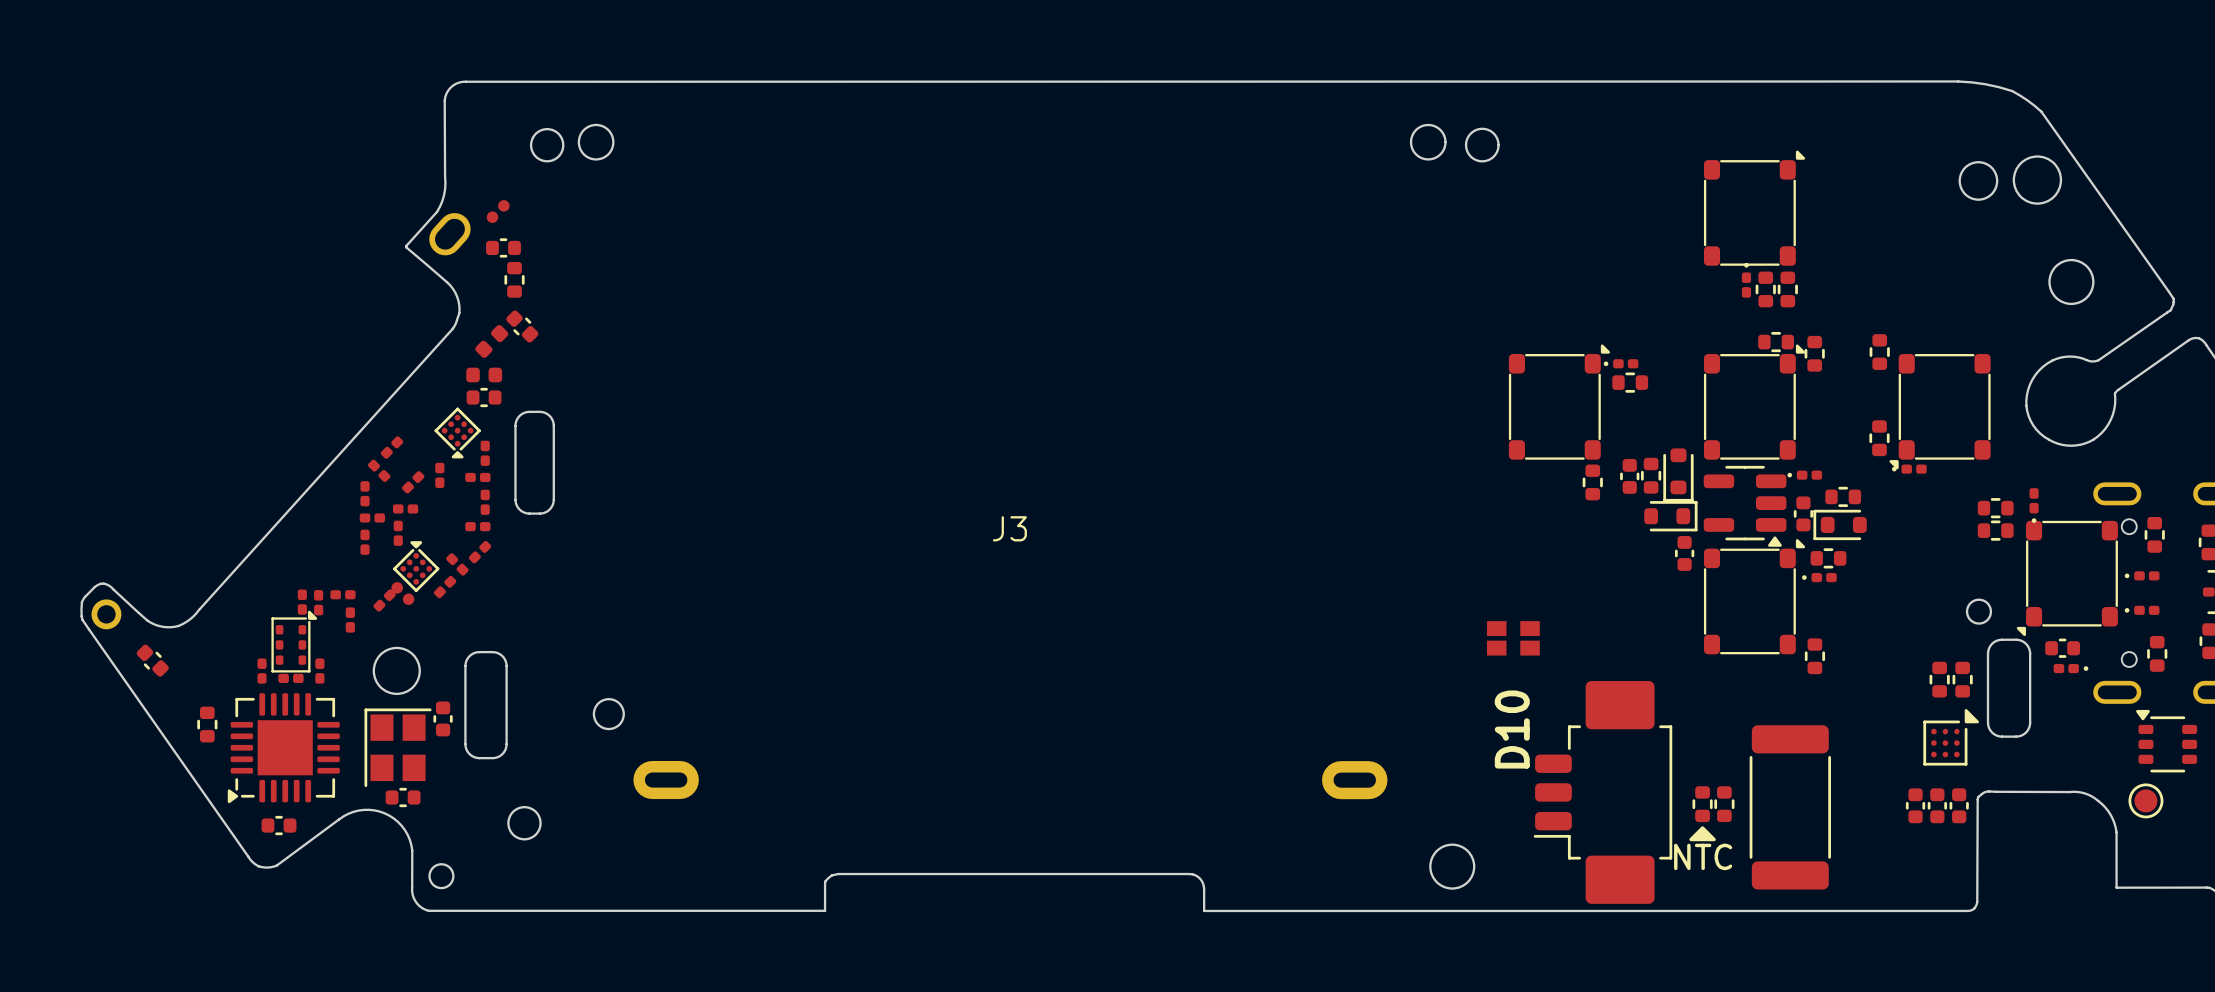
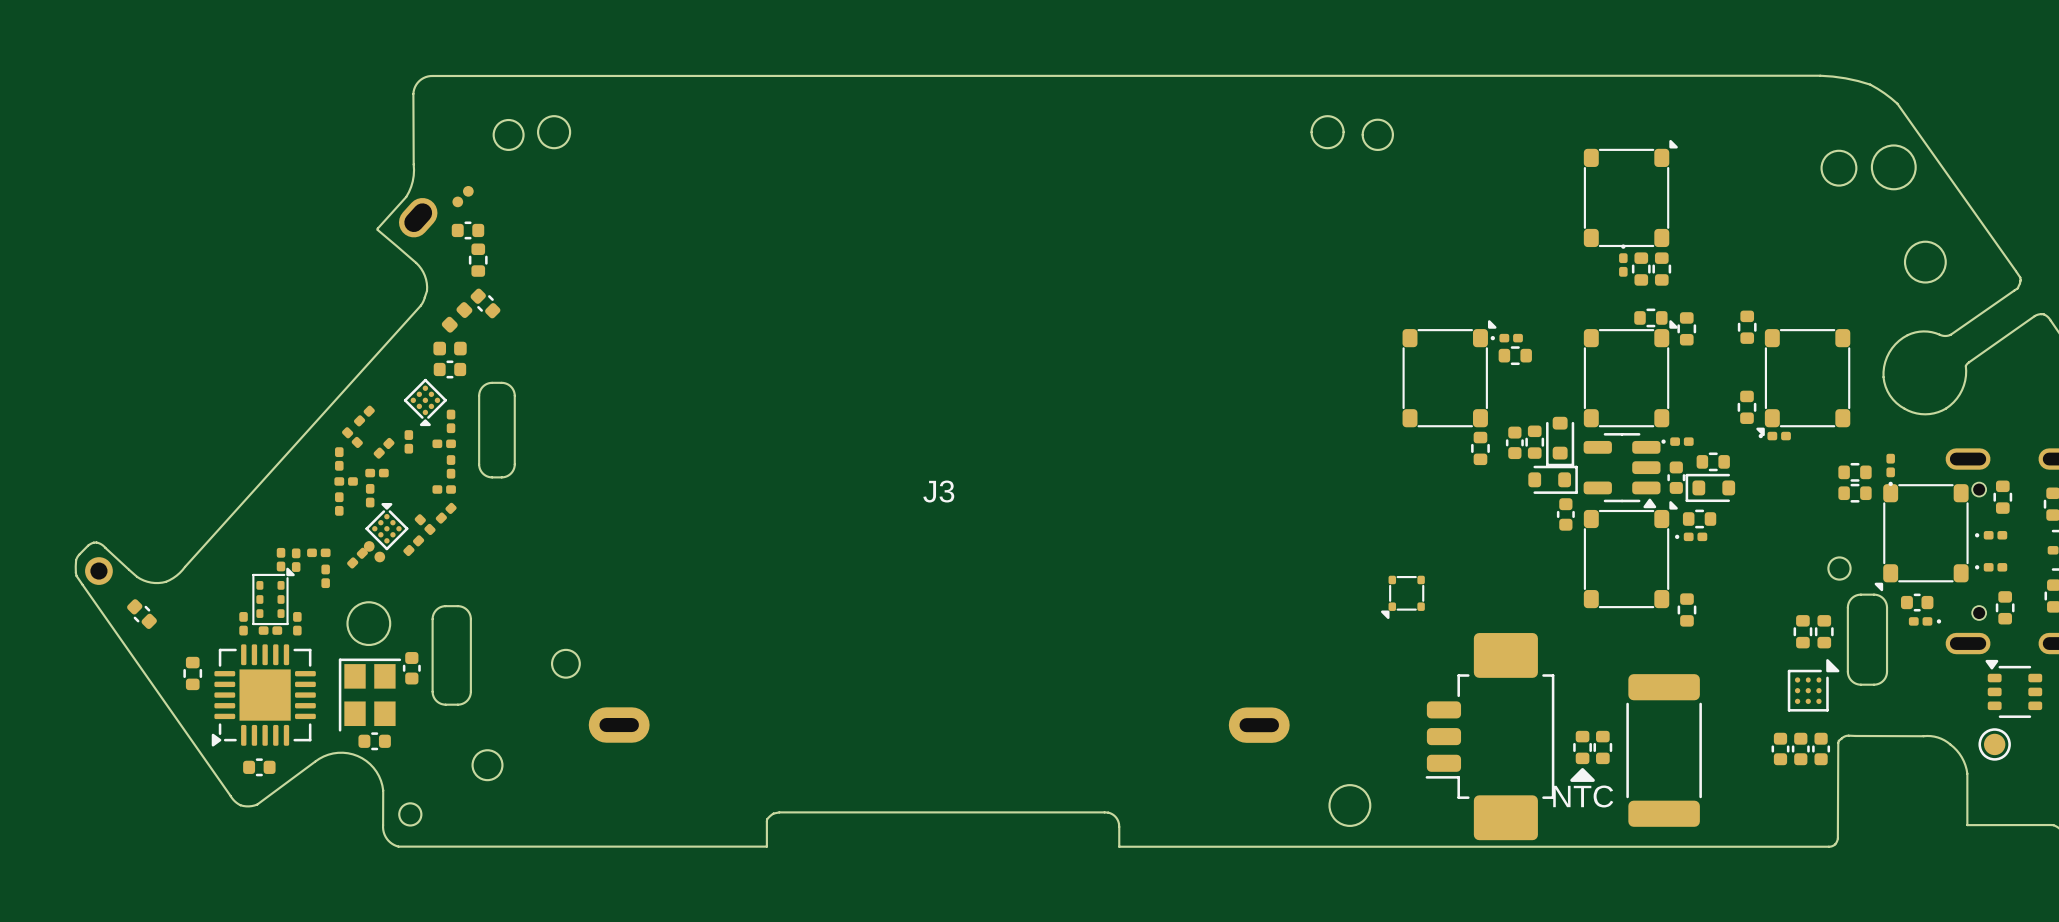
D10: (1513, 638) -> none
part: none -> (1402, 597)

